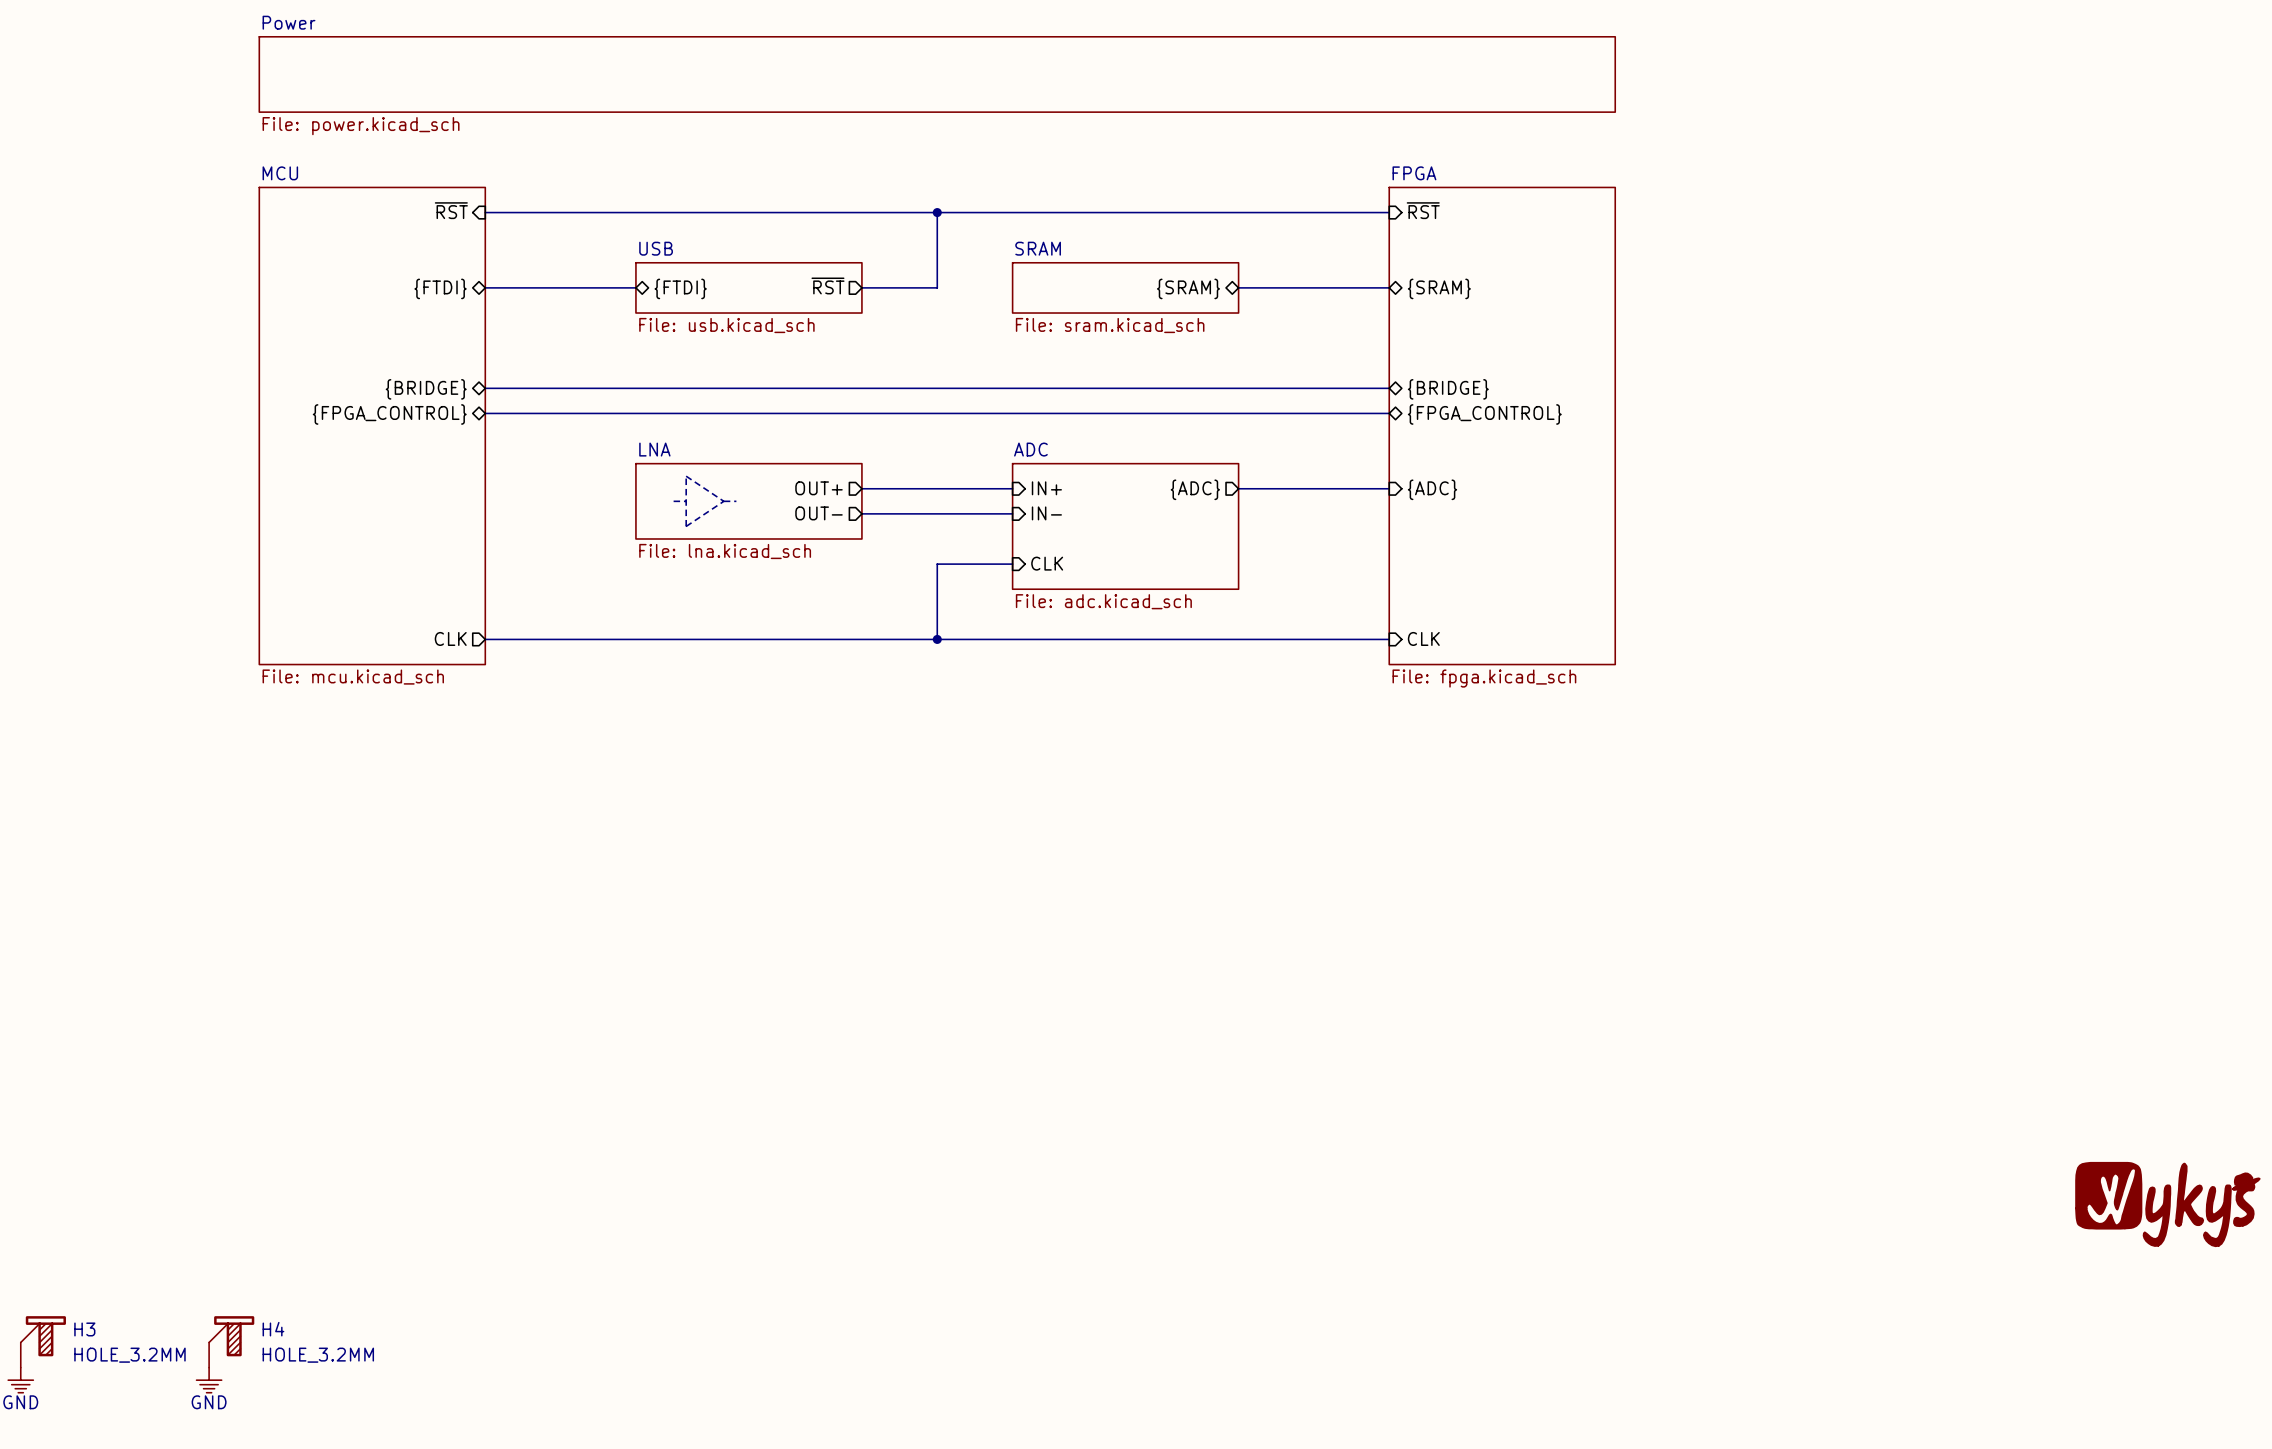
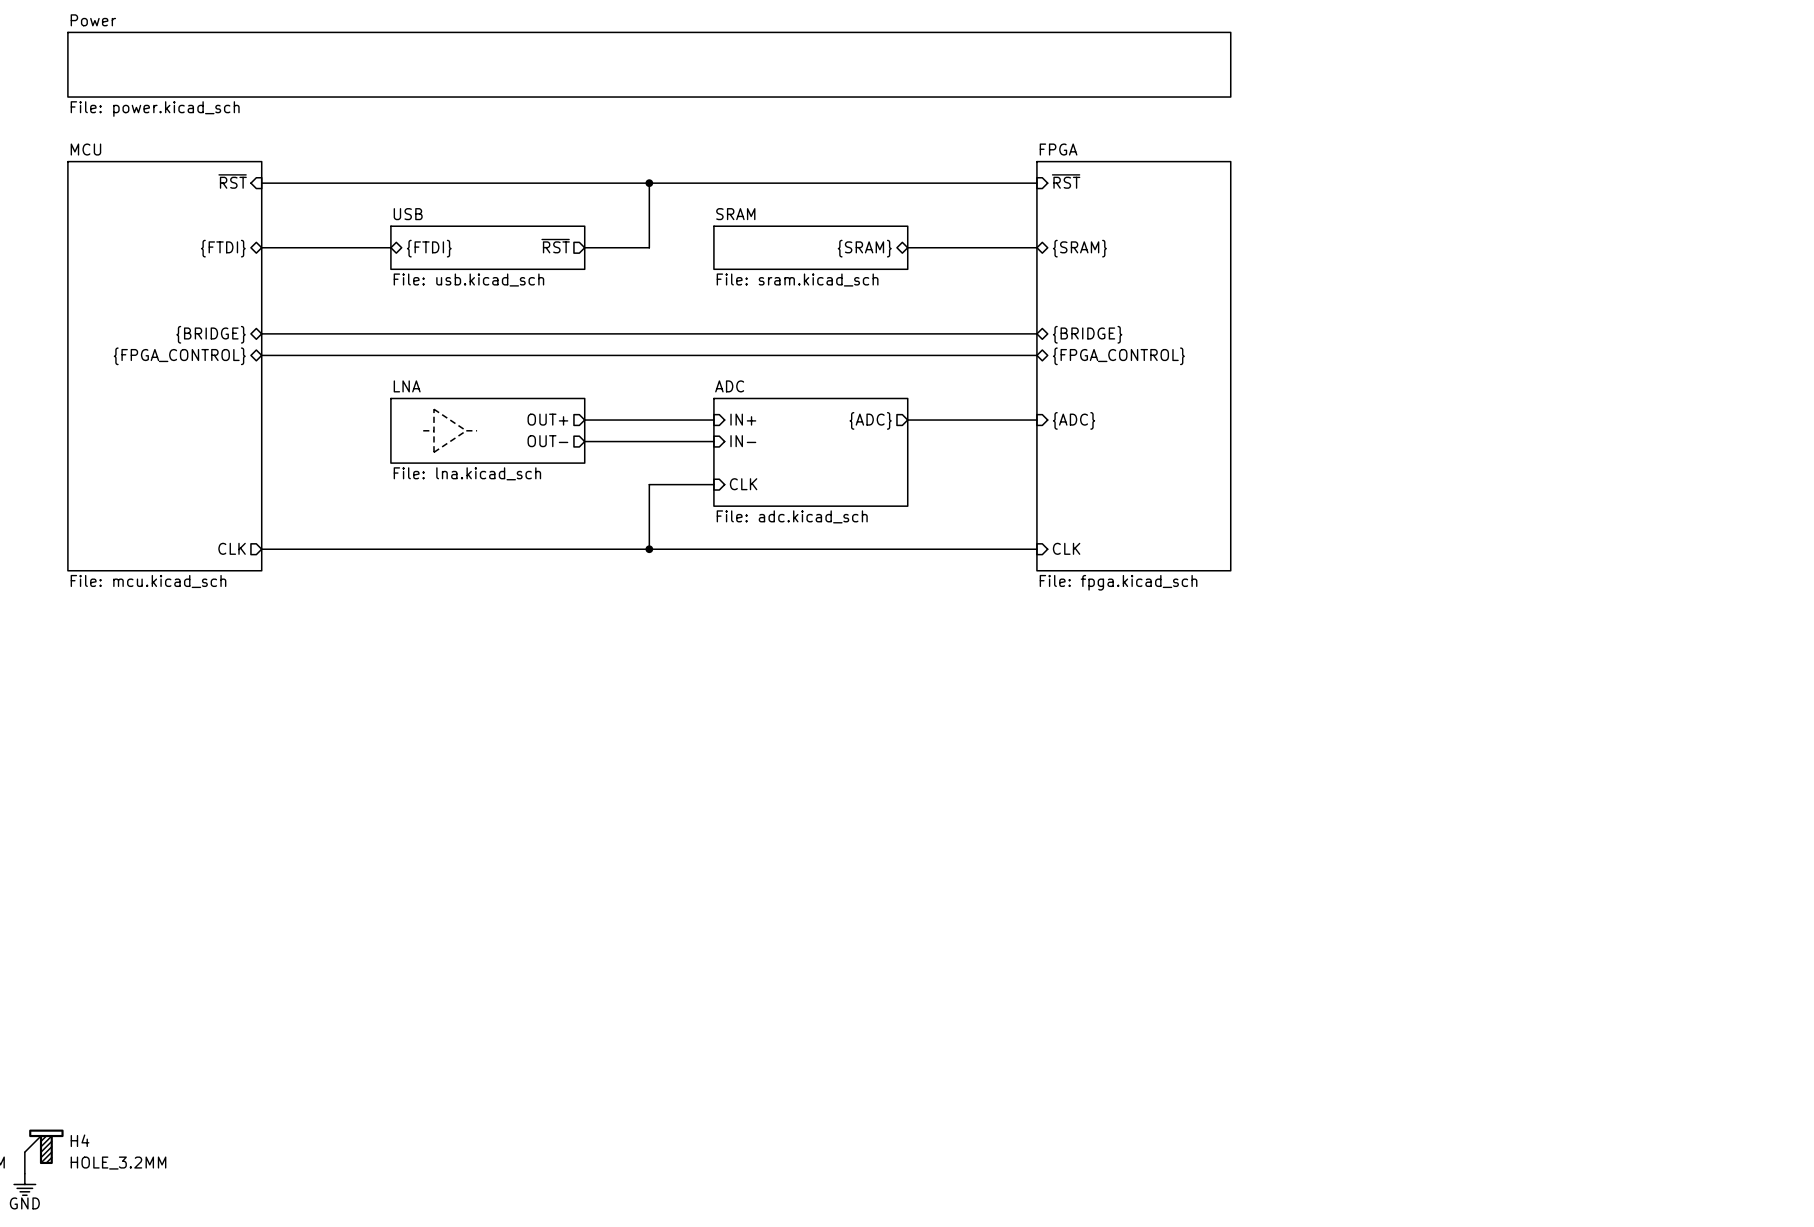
part: (2167, 1204) -> none

